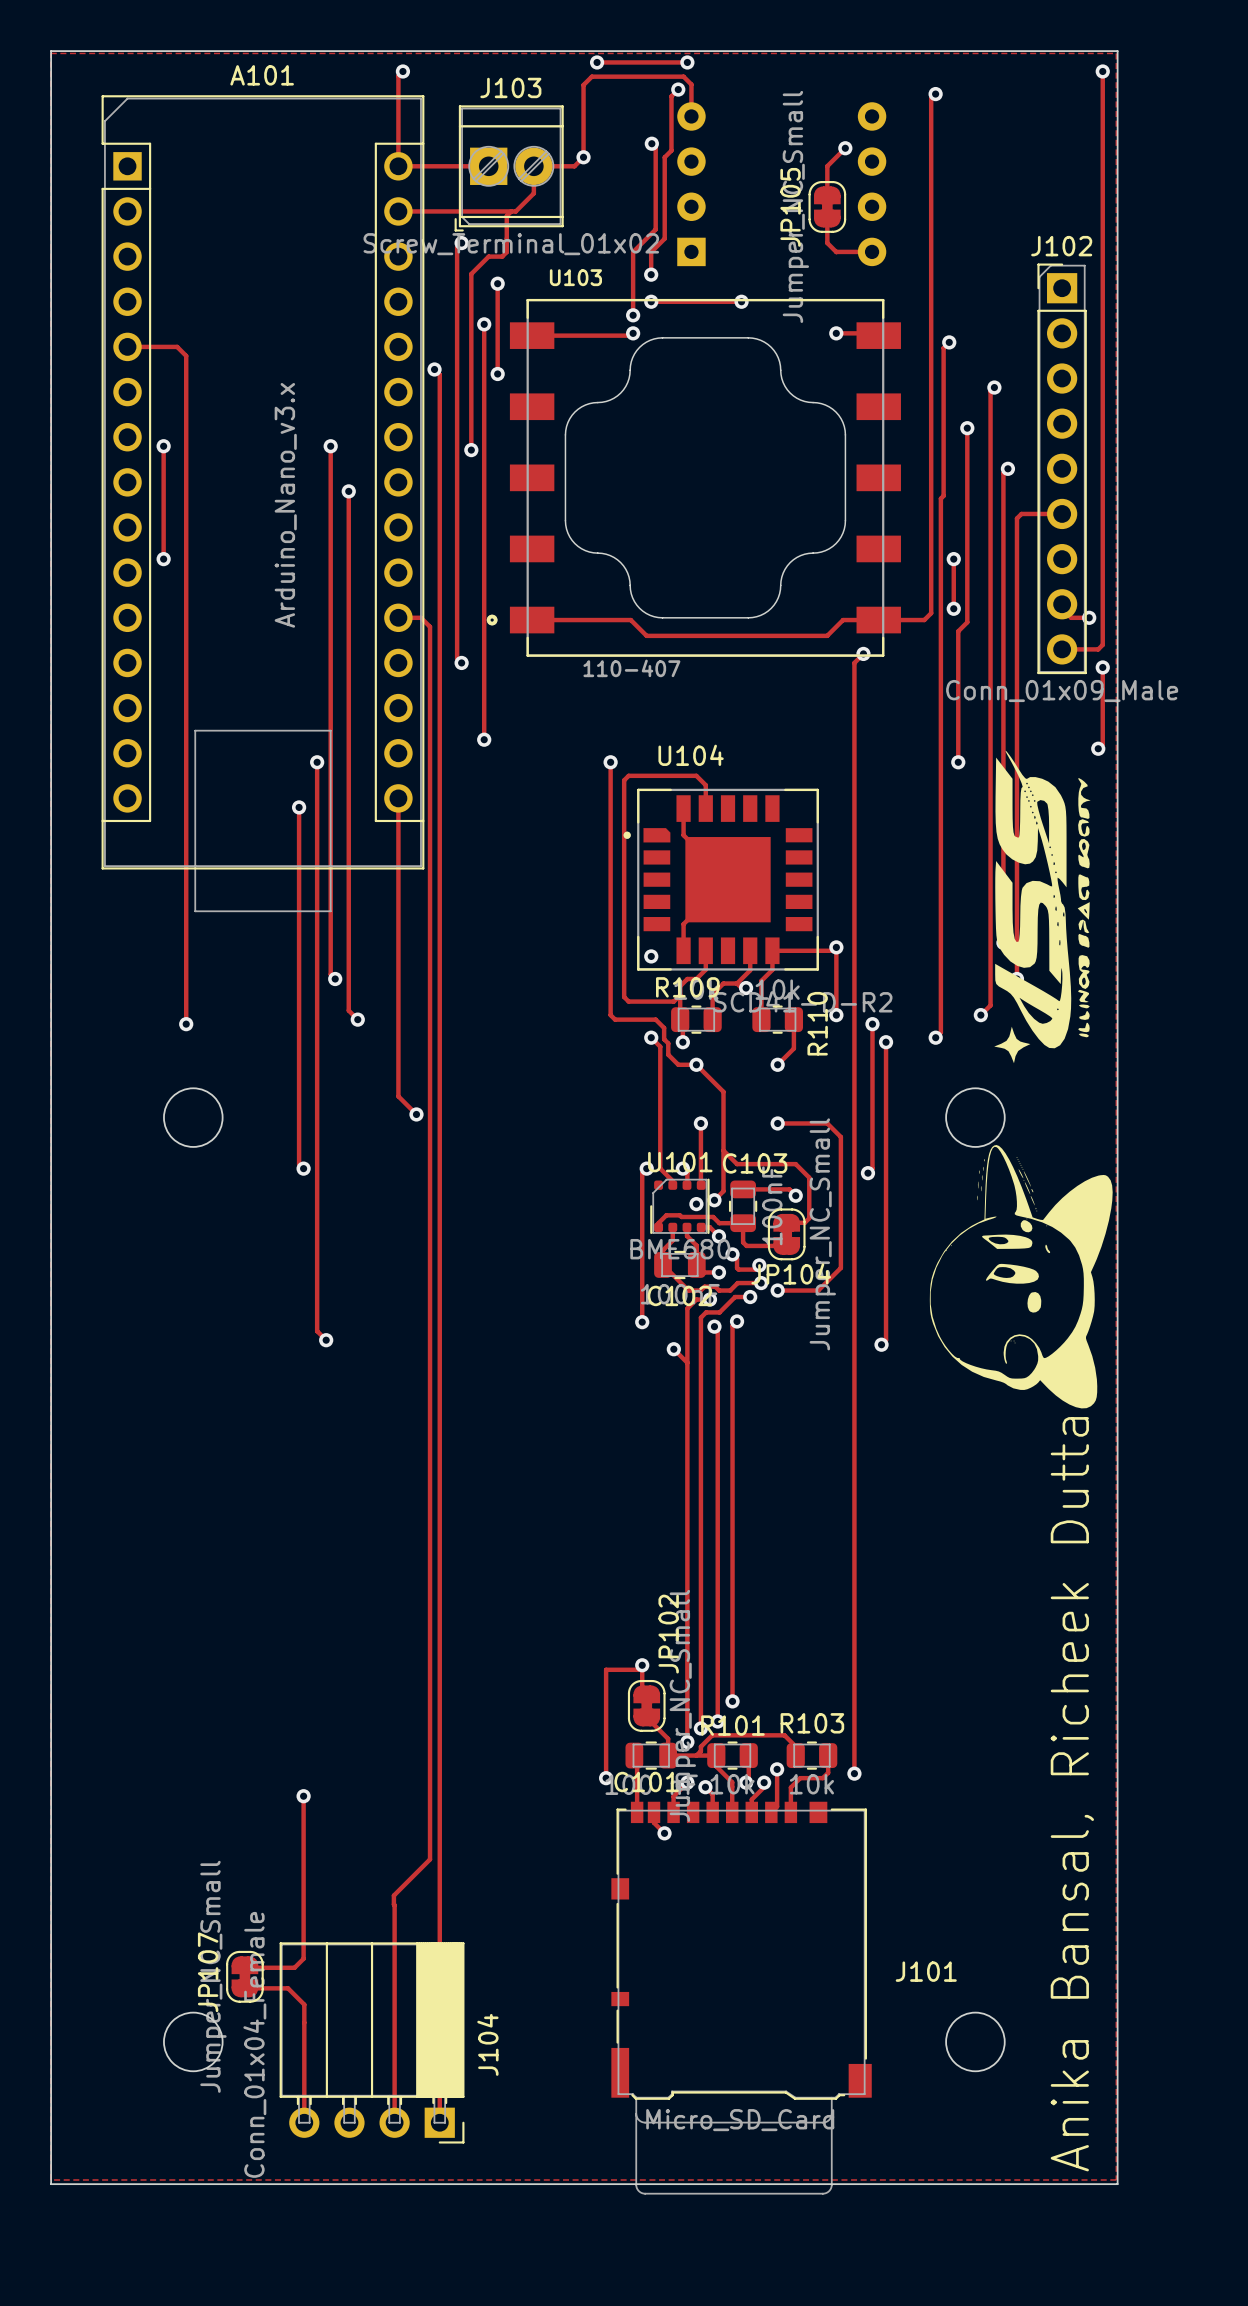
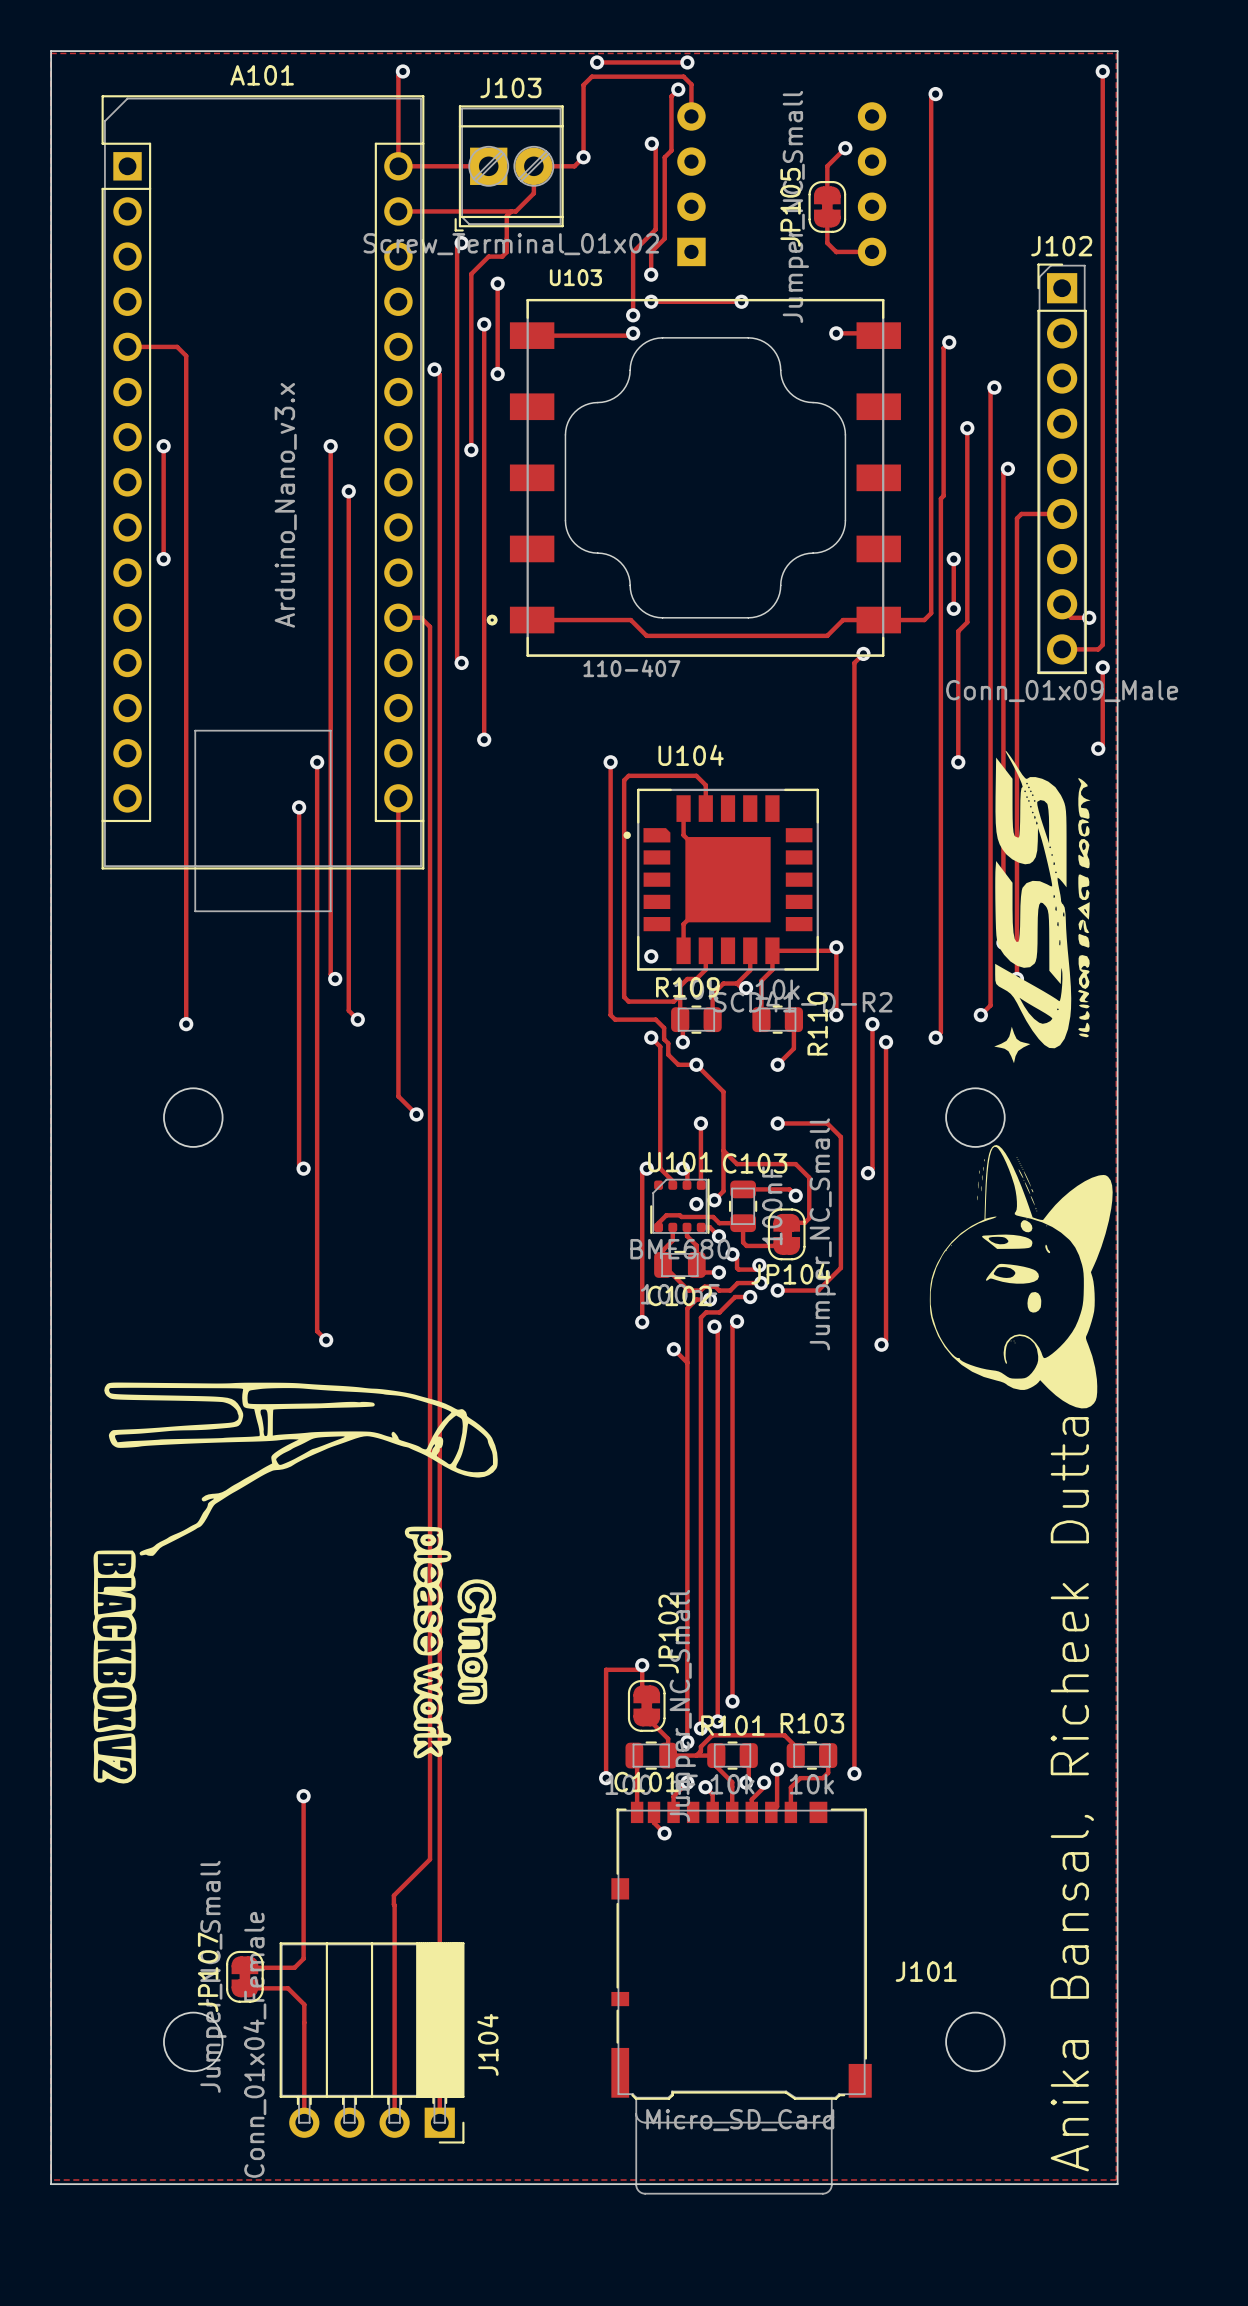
drawing: none -> [92, 1382, 498, 1784]

